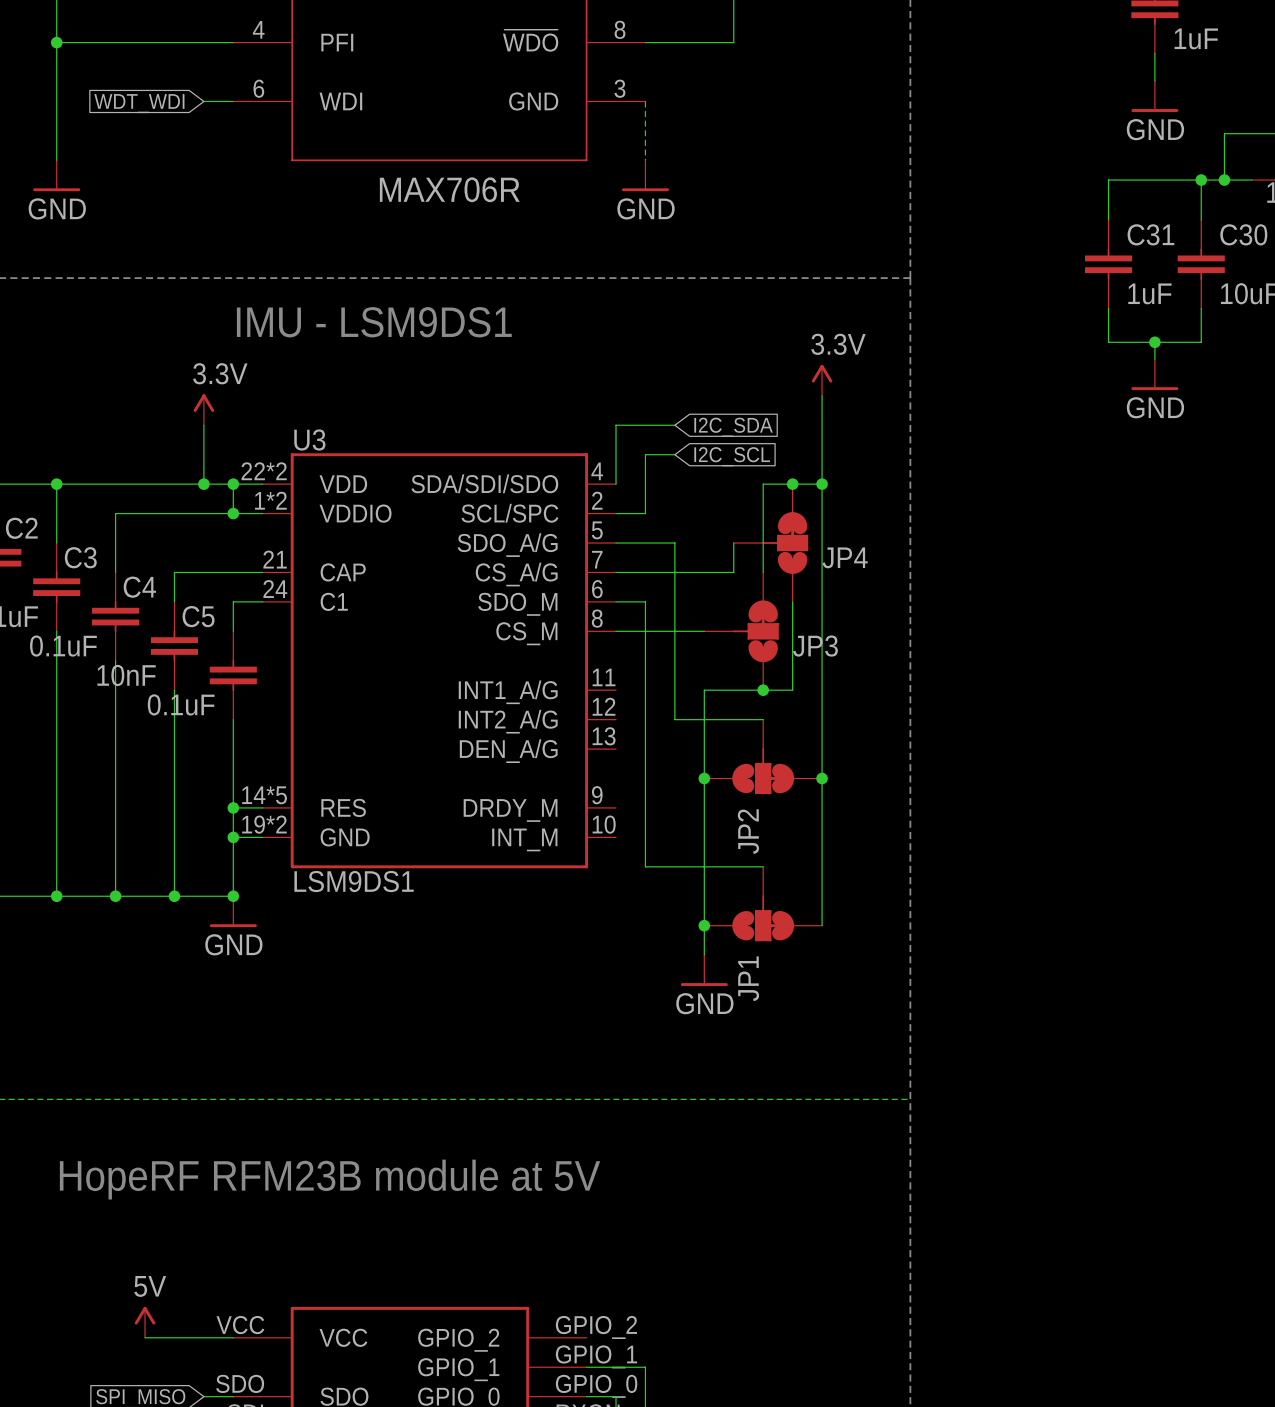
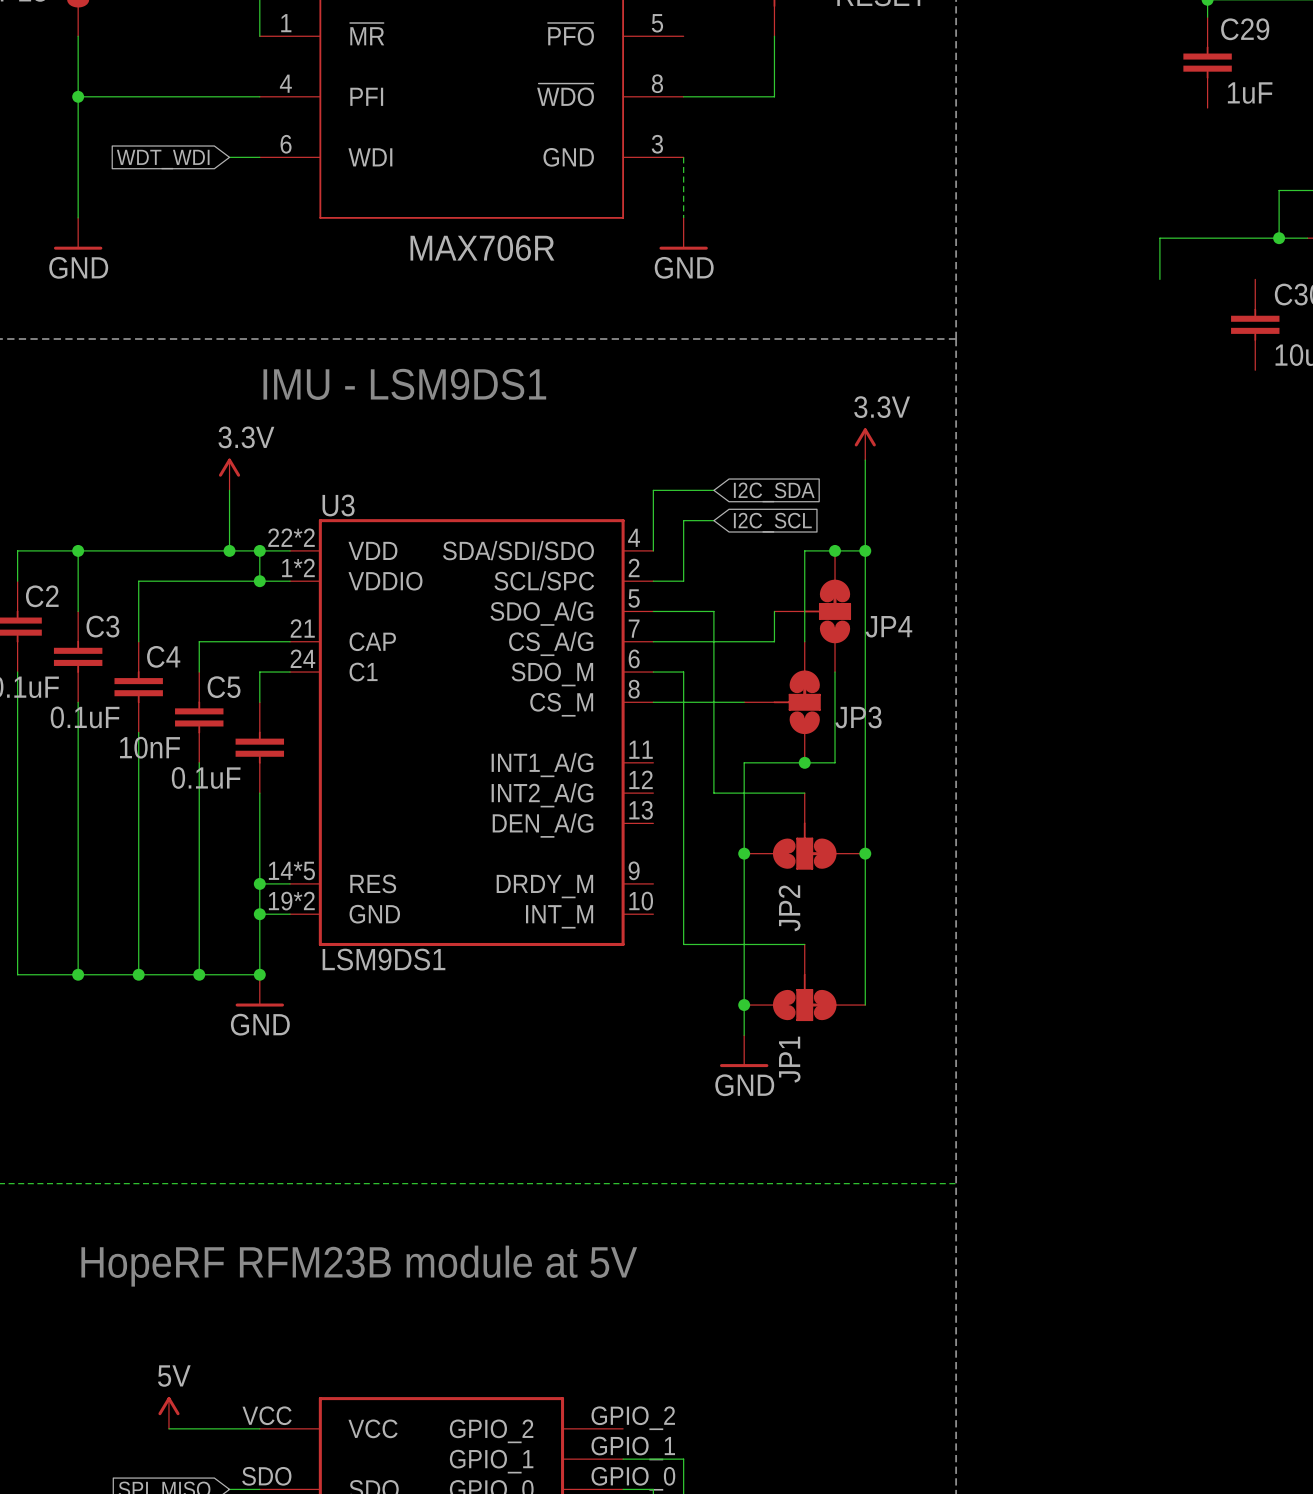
wire: (1154, 53) (1154, 81) -> none
power symbol: GND (1154, 96) -> none
wire: (1201, 180) (1201, 220) -> none
junction: (1201, 180) -> none
C31: 1uF (1108, 264) -> none
wire: (1108, 308) (1108, 342) (1201, 342) (1201, 308) -> none
wire: (1154, 342) (1154, 359) -> none
junction: (1154, 342) -> none
power symbol: GND (1154, 374) -> none

